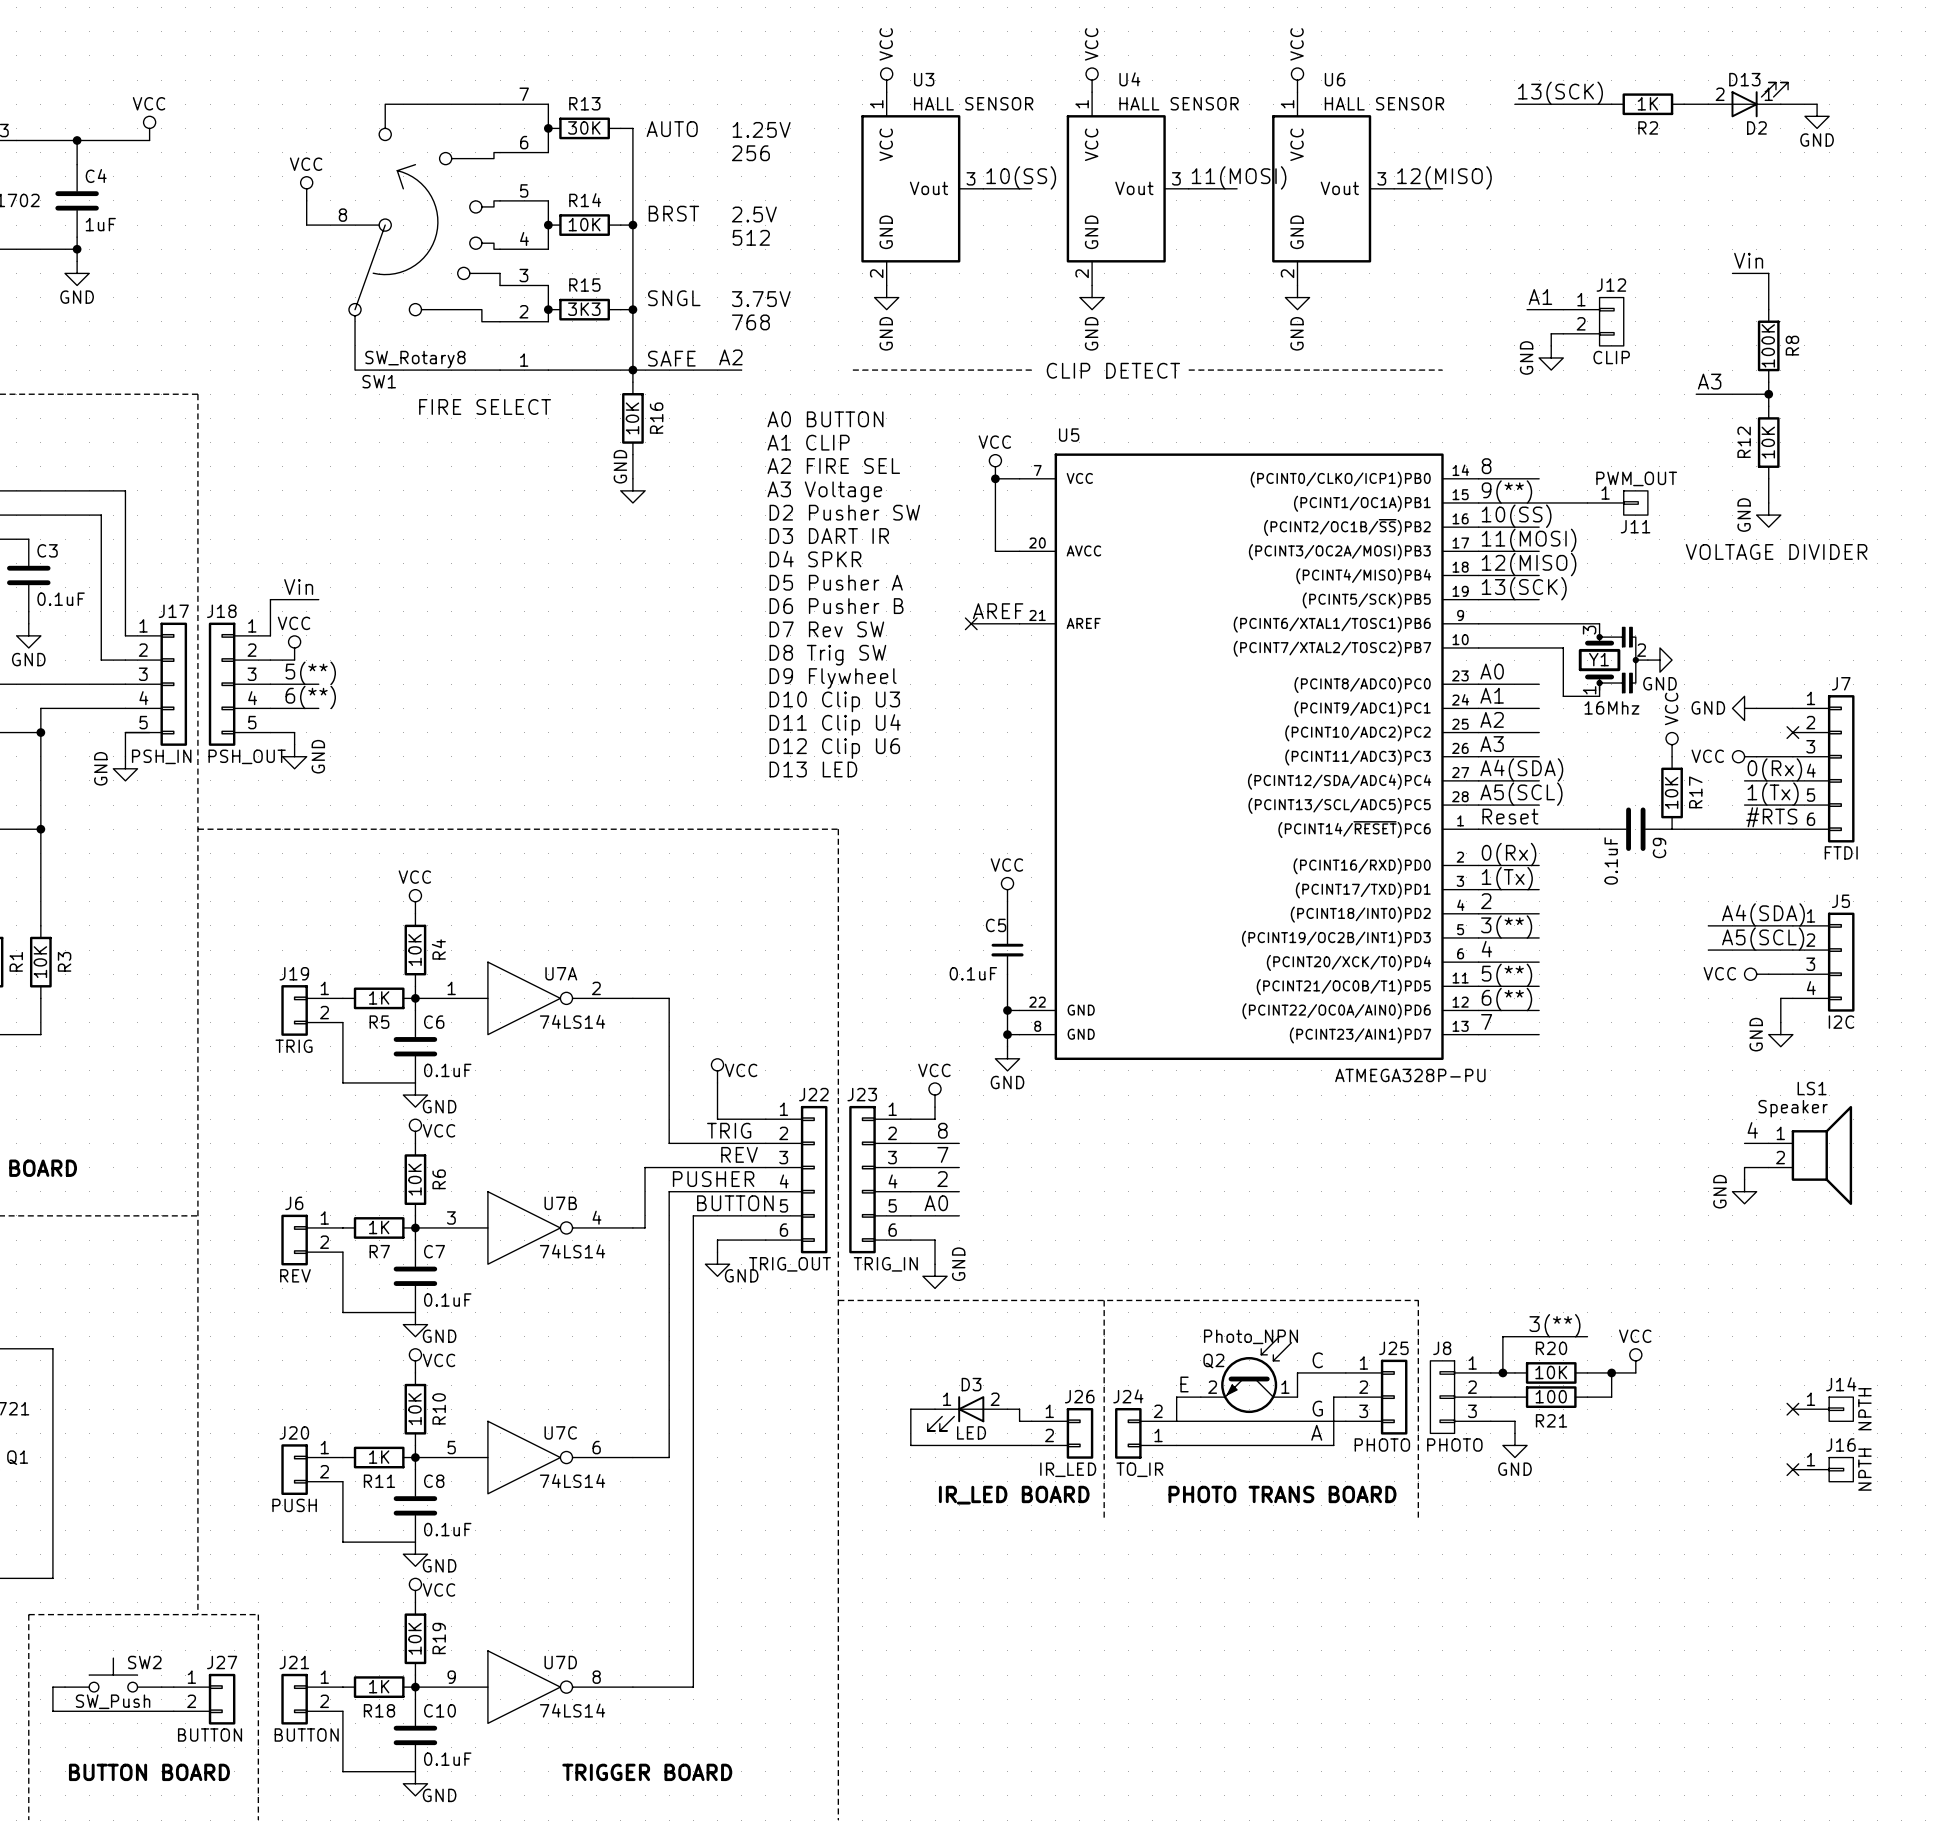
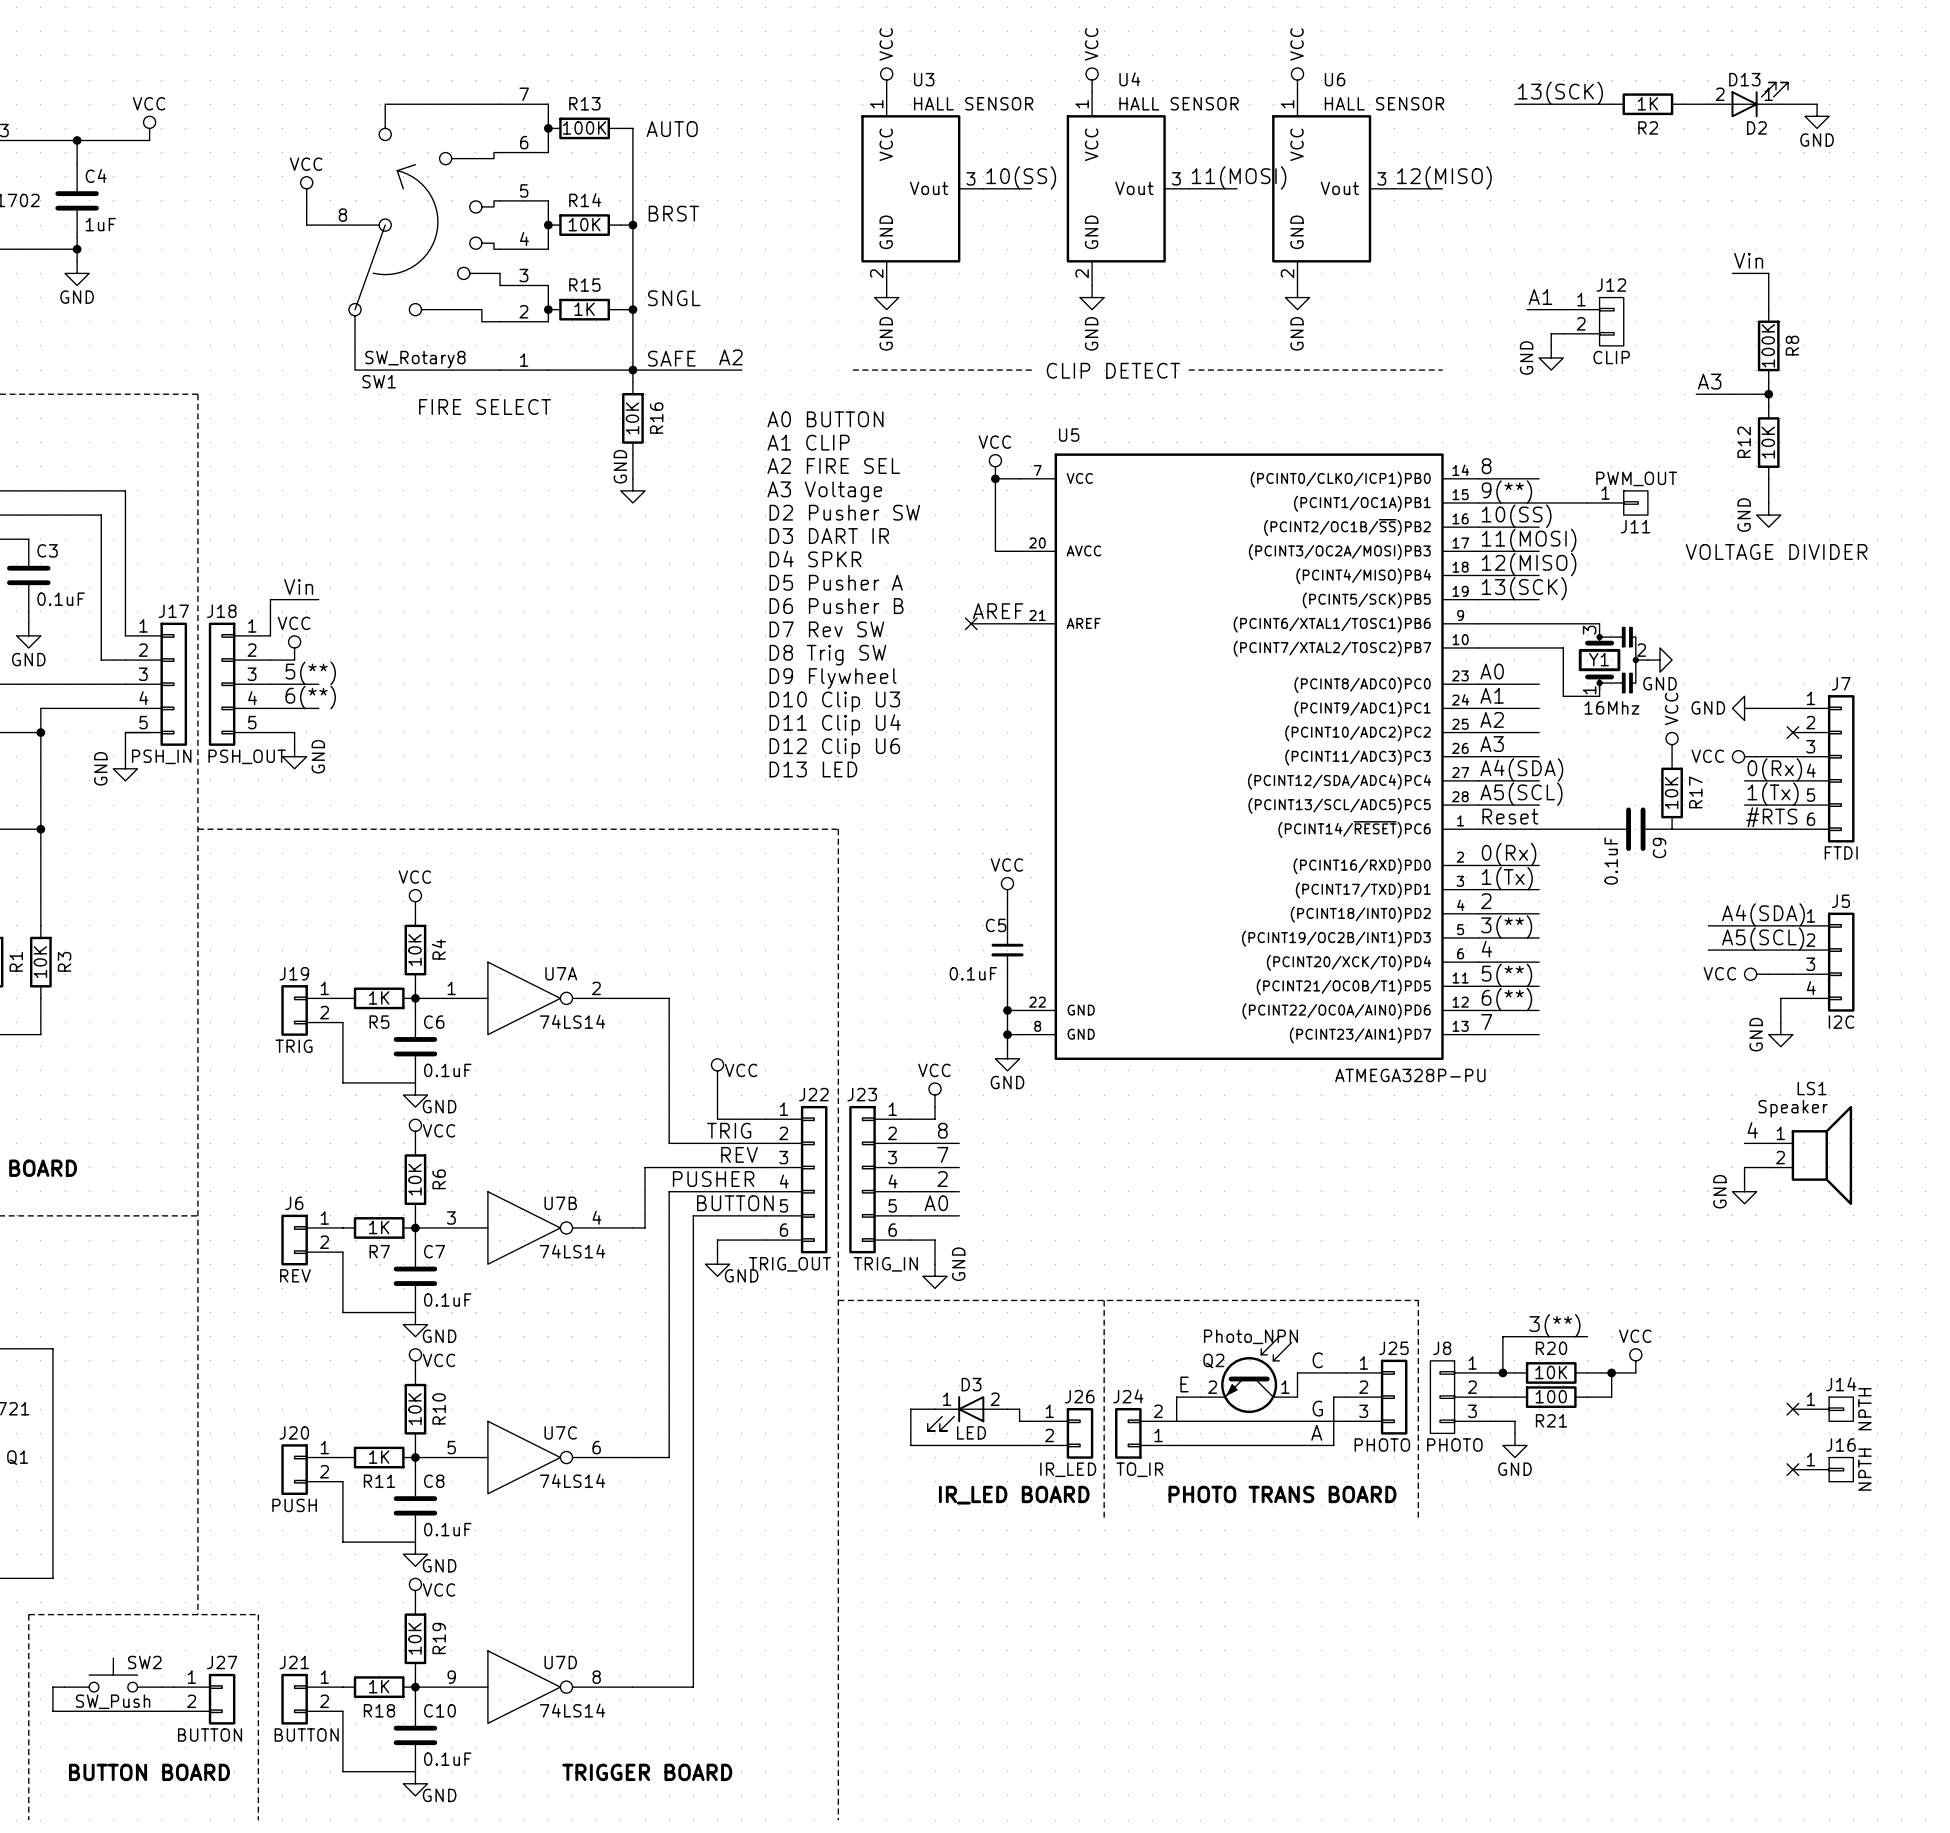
R13 value: 30K (584, 127) -> 100K (584, 127)
text: 1.25V (761, 129) -> none
text: 256 (750, 153) -> none
text: 2.5V (754, 214) -> none
text: 512 (751, 237) -> none
text: 3.75V (761, 299) -> none
R15 value: 3K3 (584, 309) -> 1K (584, 309)
text: 768 (750, 322) -> none

